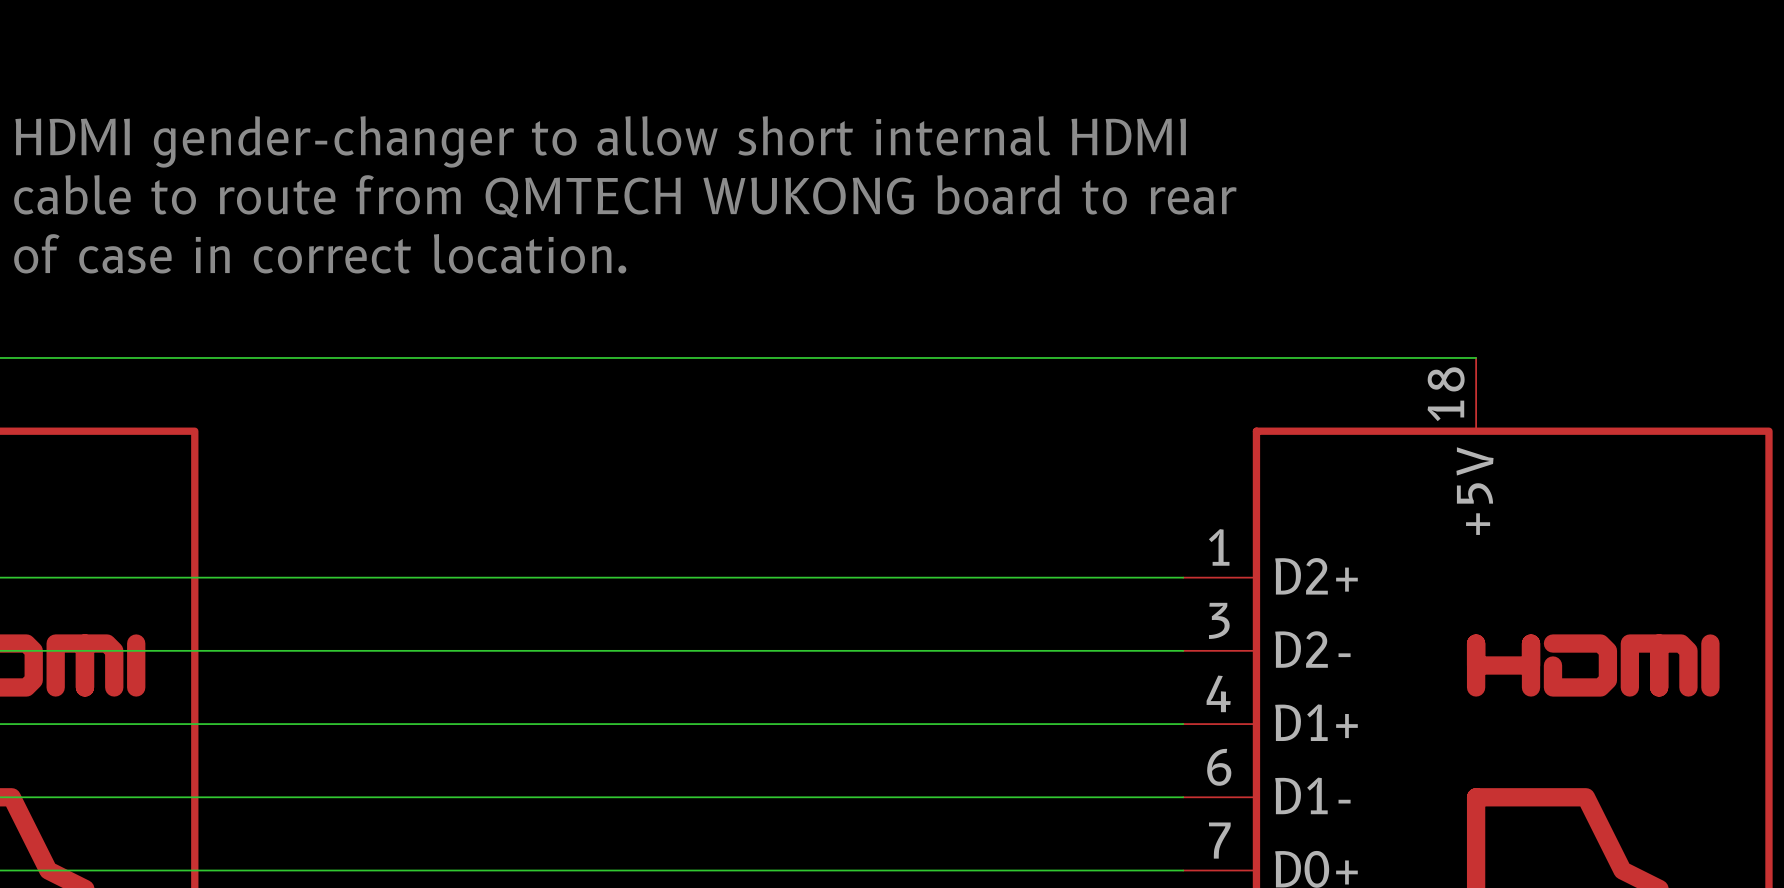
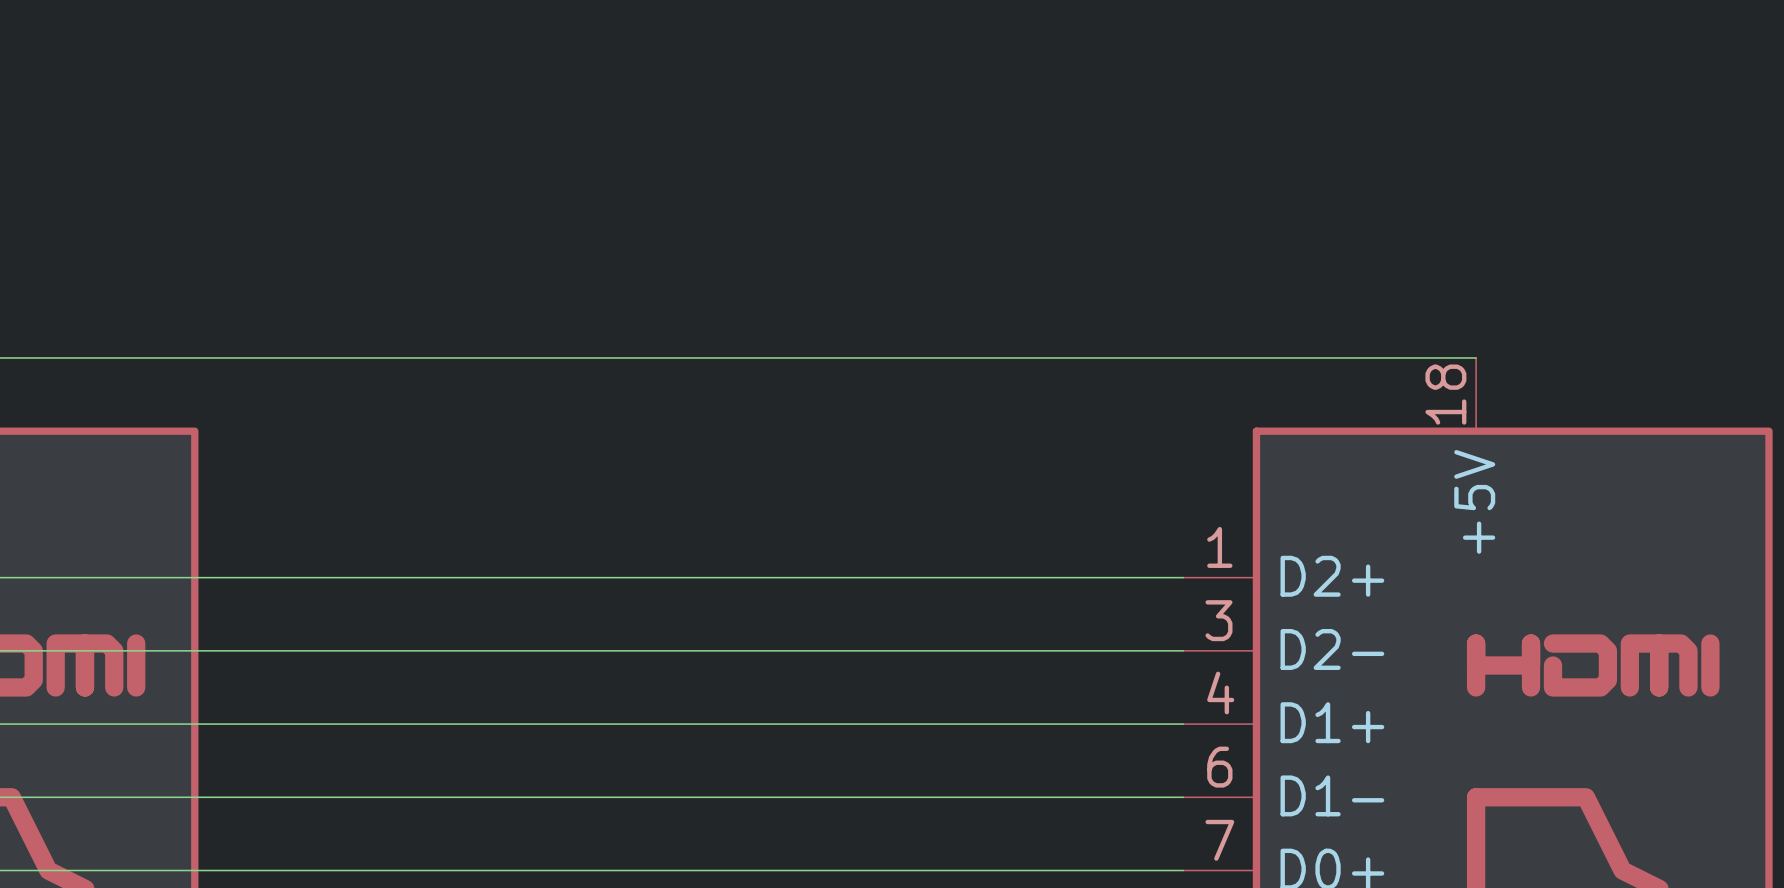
text: HDMI gender-changer to allow short internal HDMI (600, 141) -> none
text: cable to route from QMTECH WUKONG board to rear (625, 196) -> none
text: of case in correct location. (320, 253) -> none

